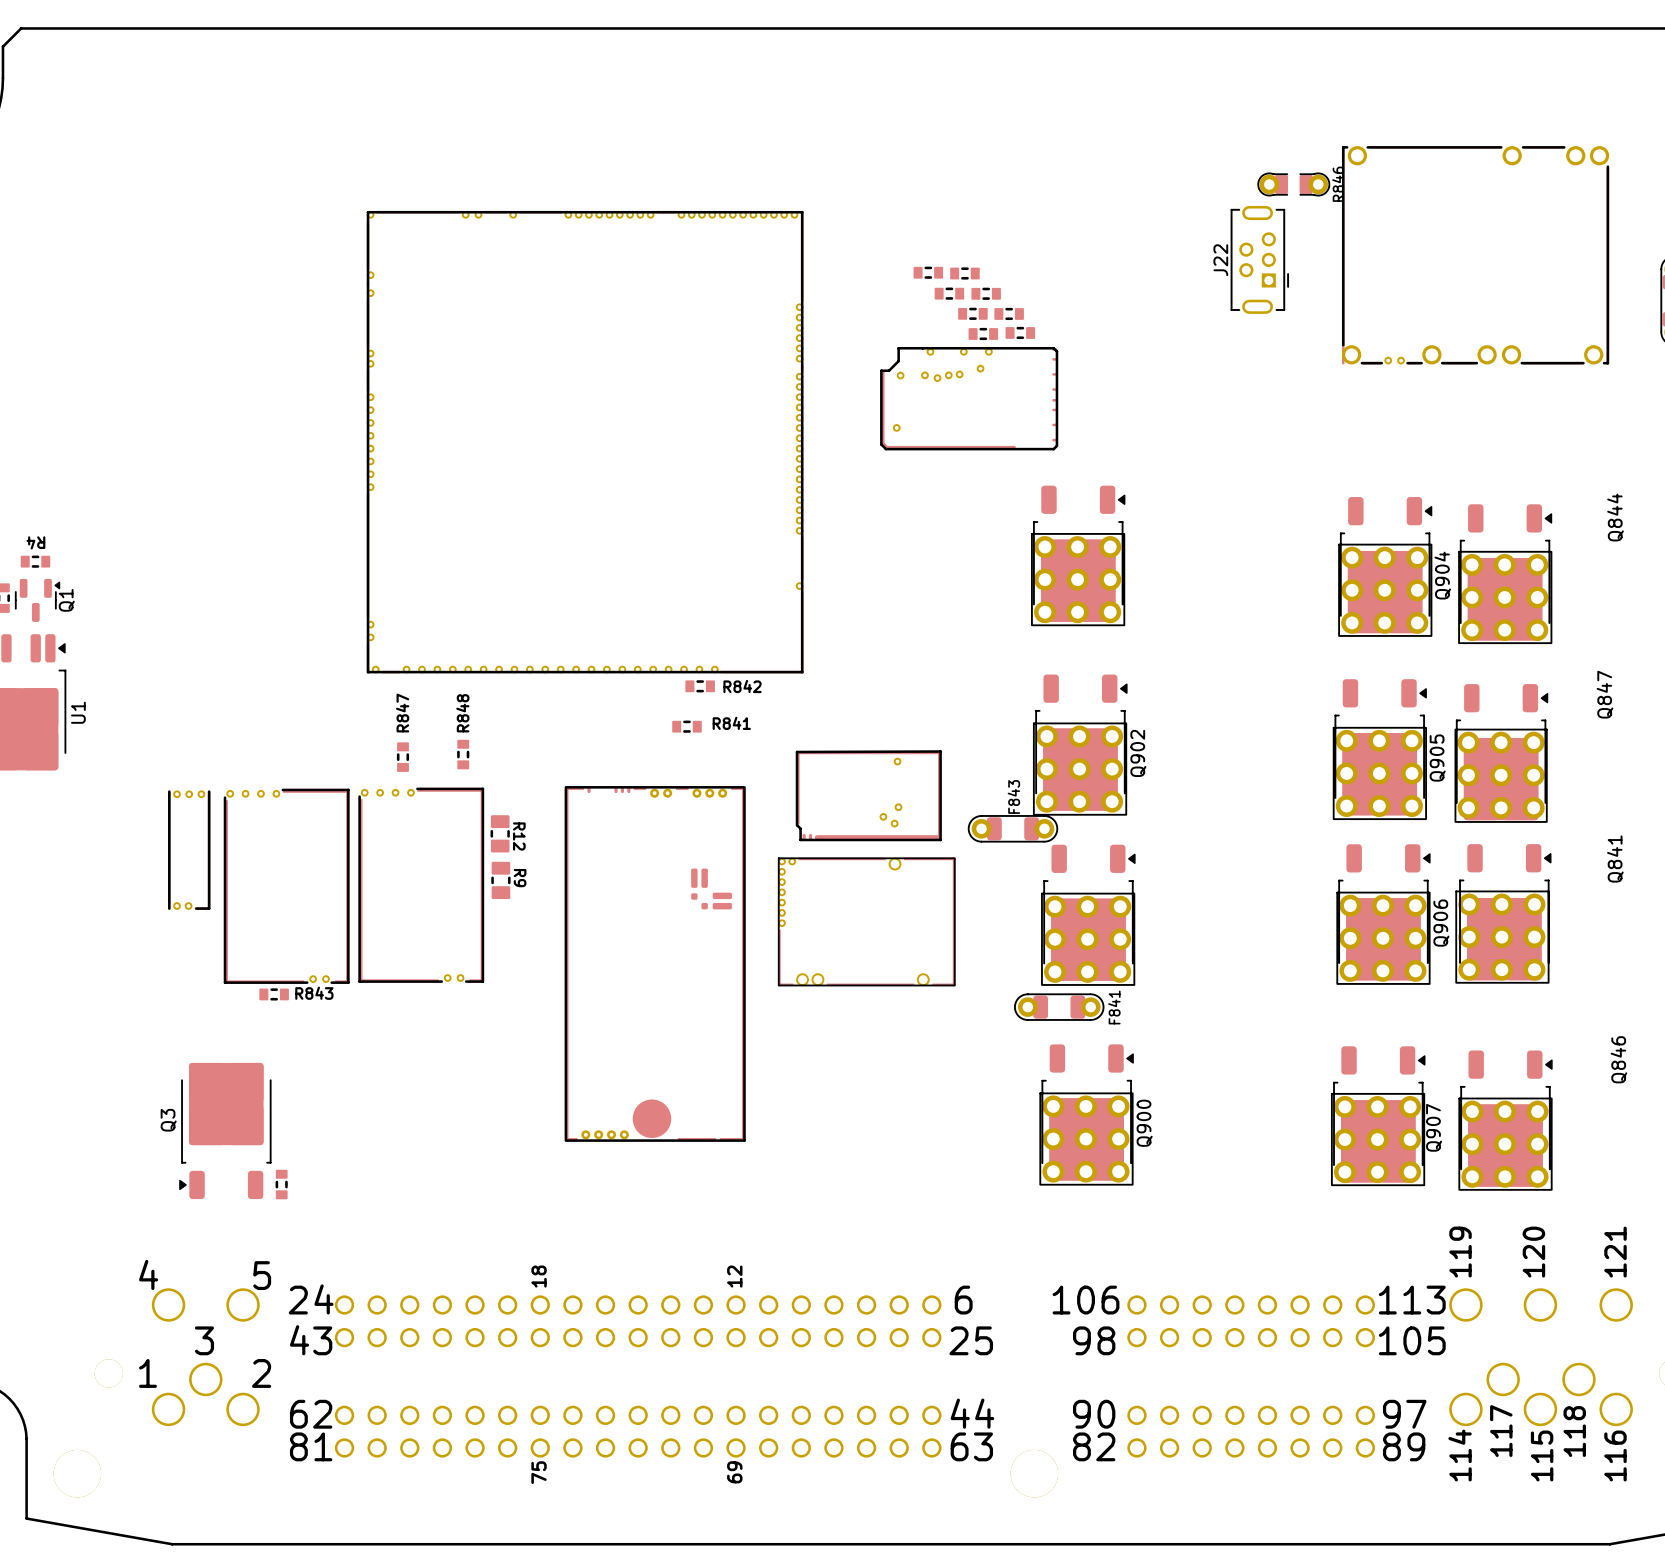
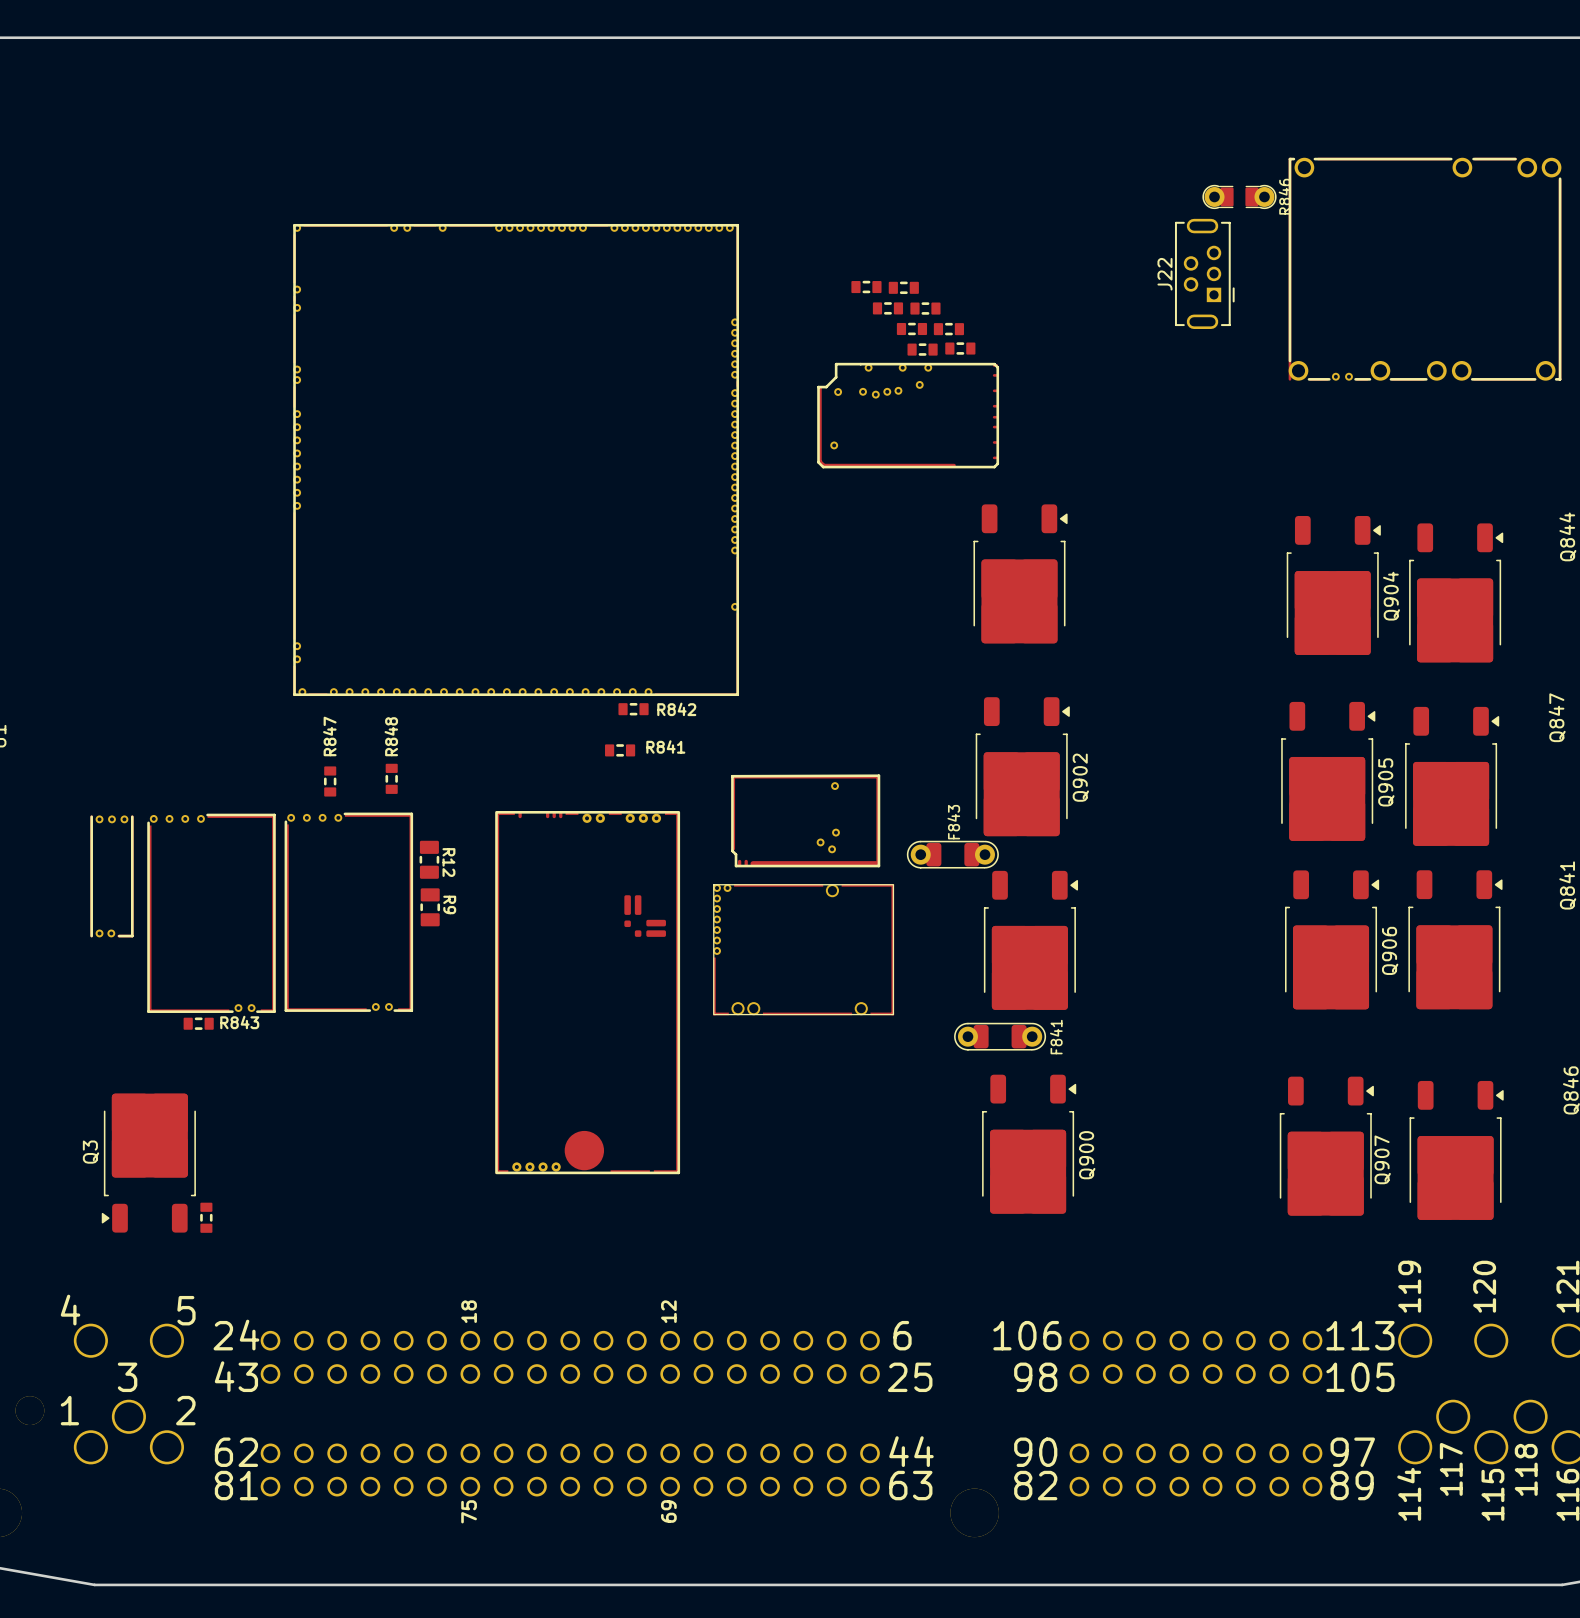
part: (1078, 579) -> none
part: (1385, 590) -> none
part: (1505, 597) -> none
part: (1080, 769) -> none
part: (1379, 773) -> none
part: (1501, 775) -> none
part: (1502, 937) -> none
part: (1383, 938) -> none
part: (1088, 939) -> none
part: (1086, 1139) -> none
part: (1378, 1139) -> none
part: (1505, 1144) -> none

